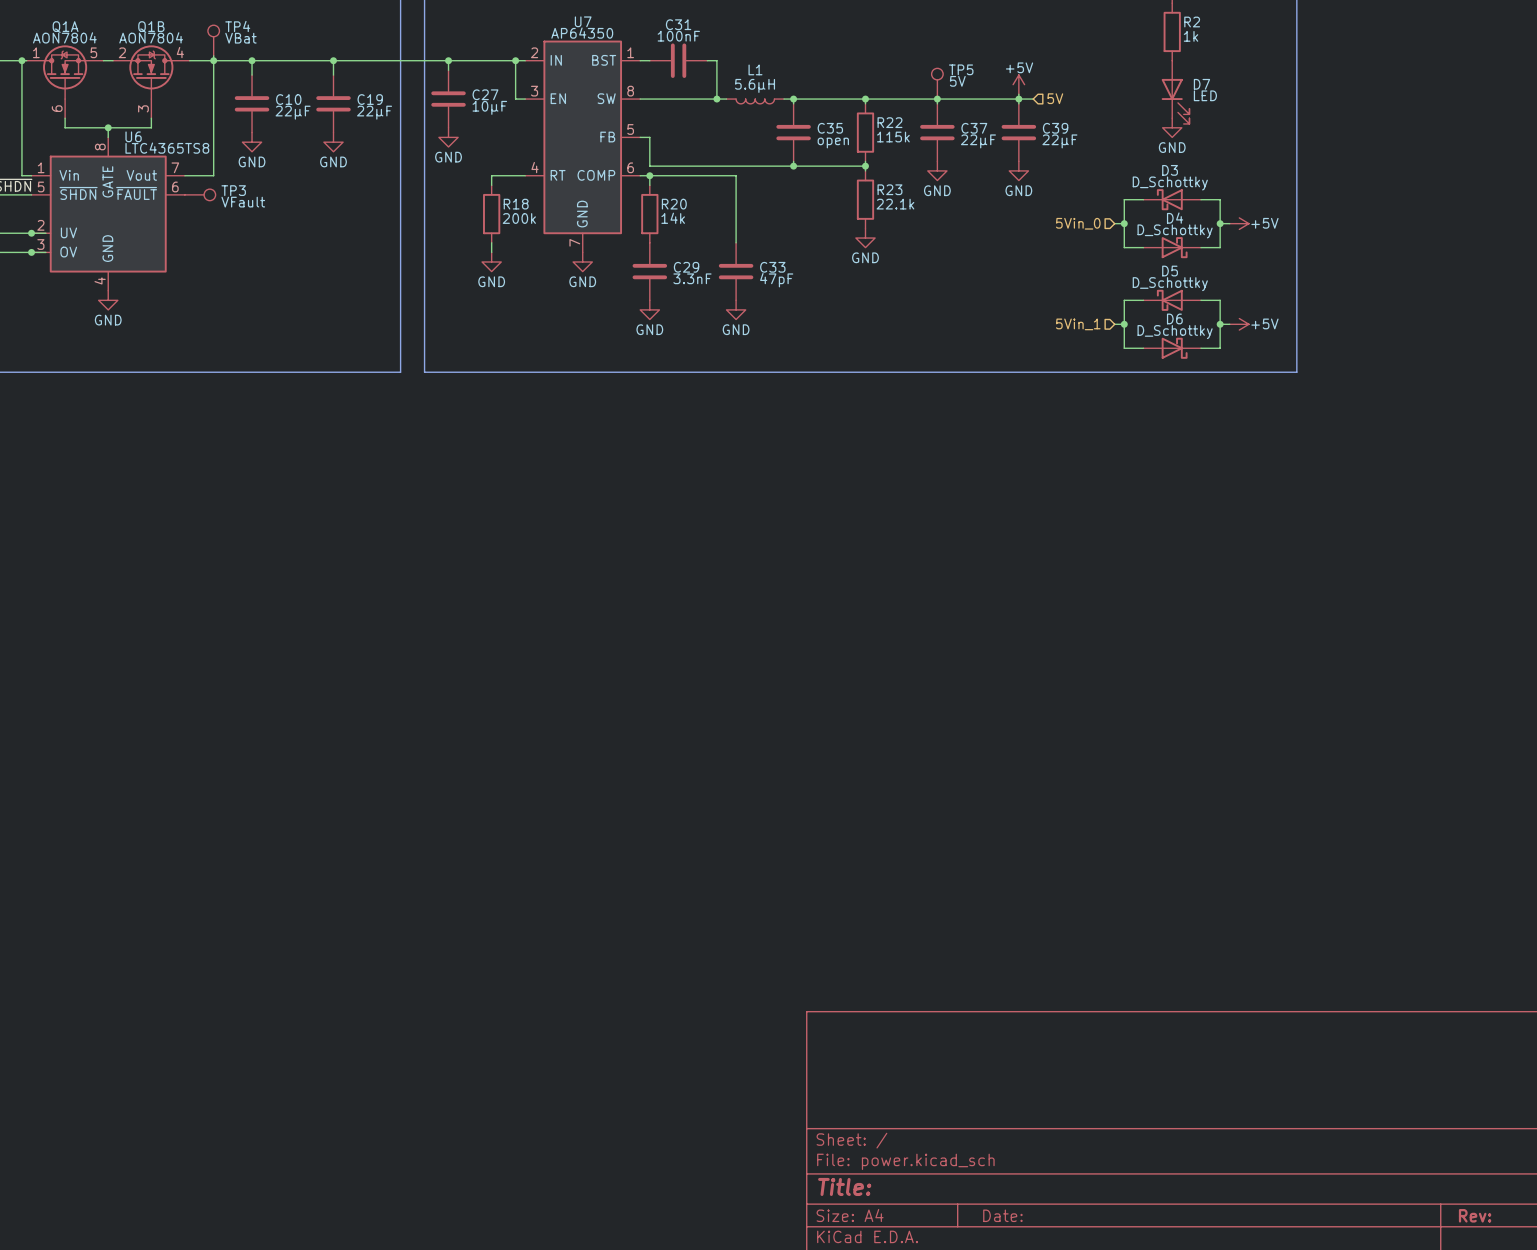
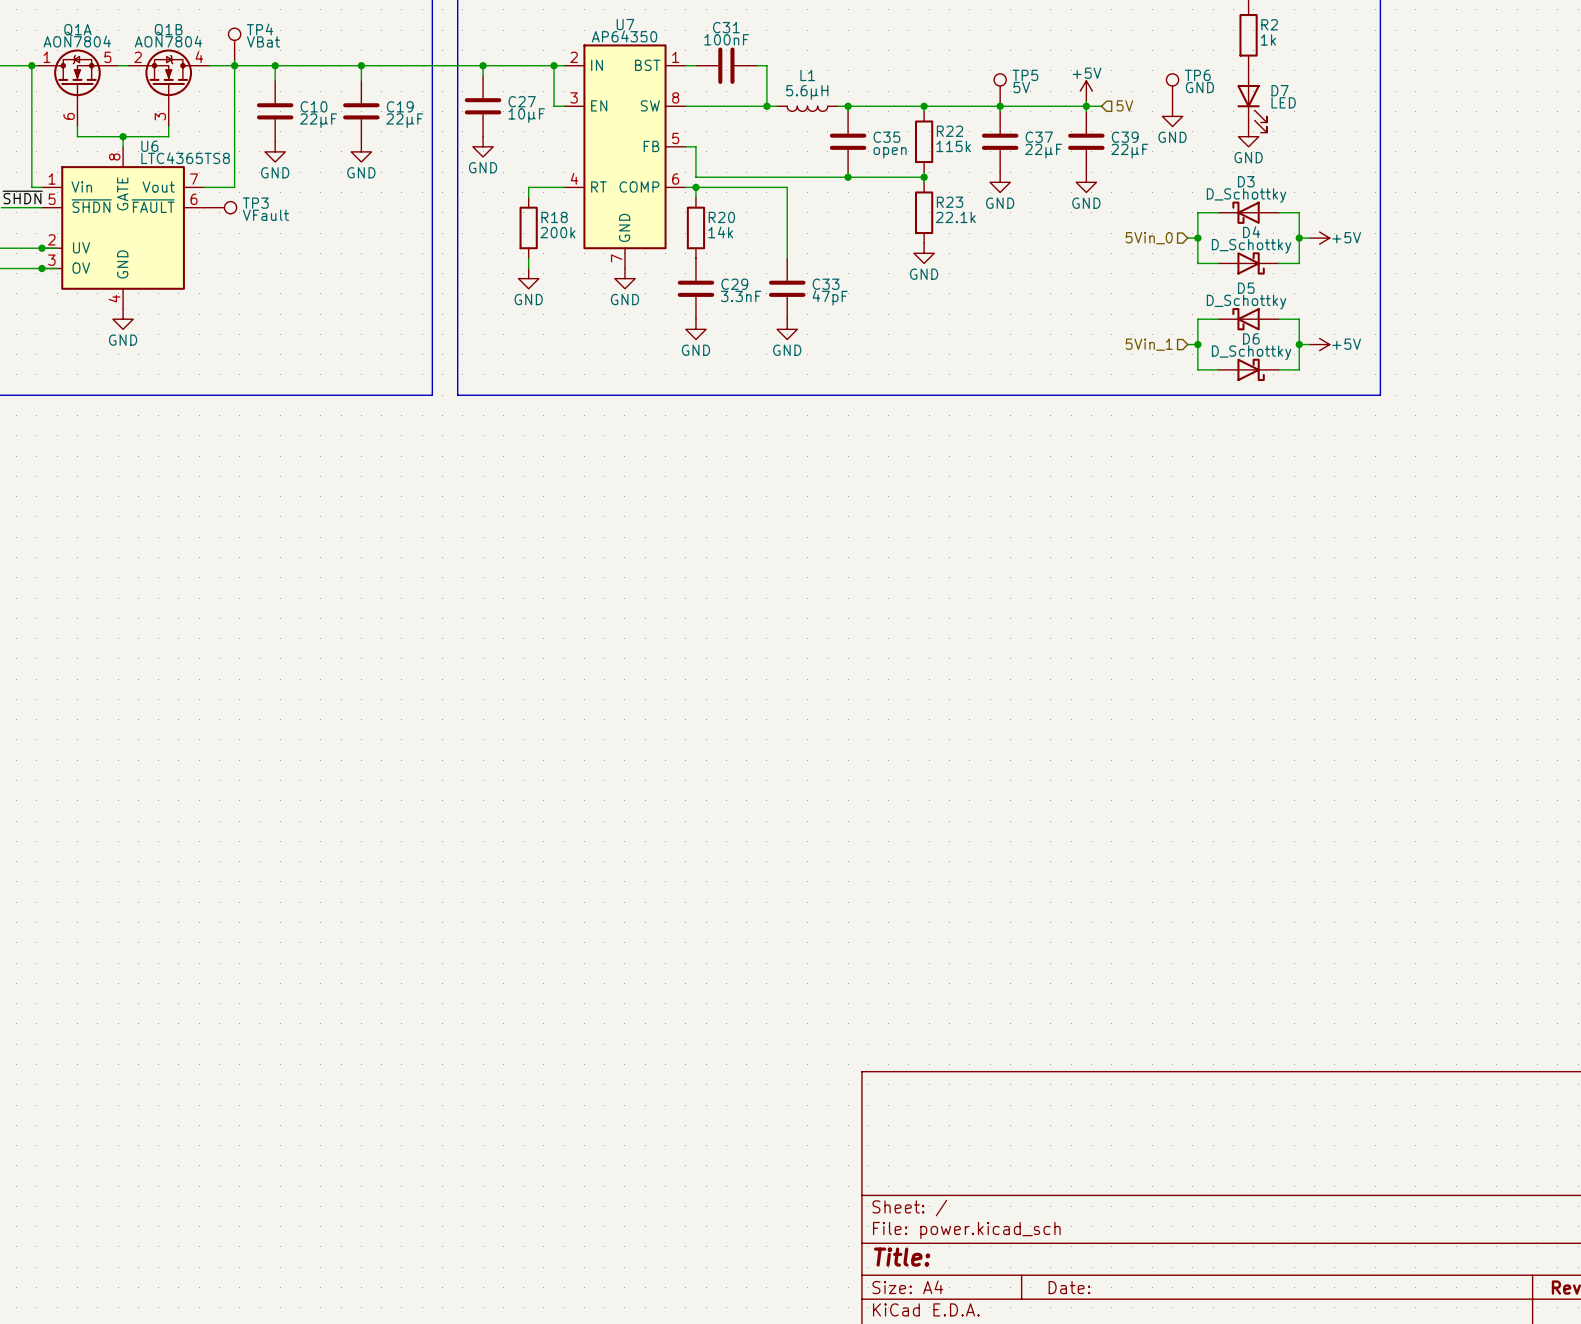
TP6: none -> GND (1172, 90)
power symbol: none -> GND (1172, 116)

